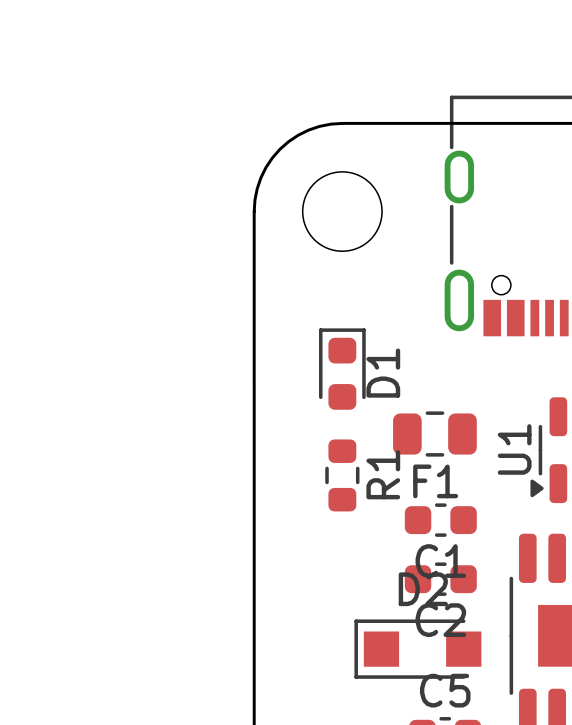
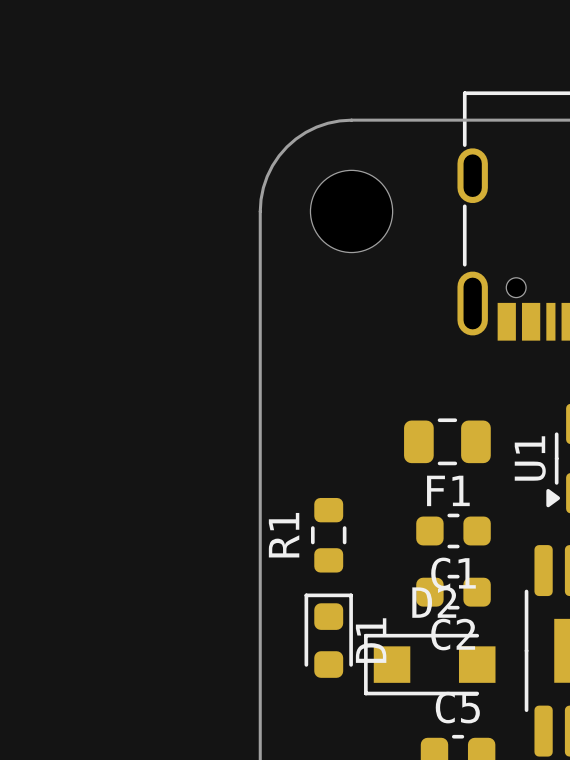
D1 position: (342, 369) -> (328, 635)
R1 name position: R1 (383, 474) -> R1 (284, 535)
R1 position: (342, 475) -> (328, 535)

